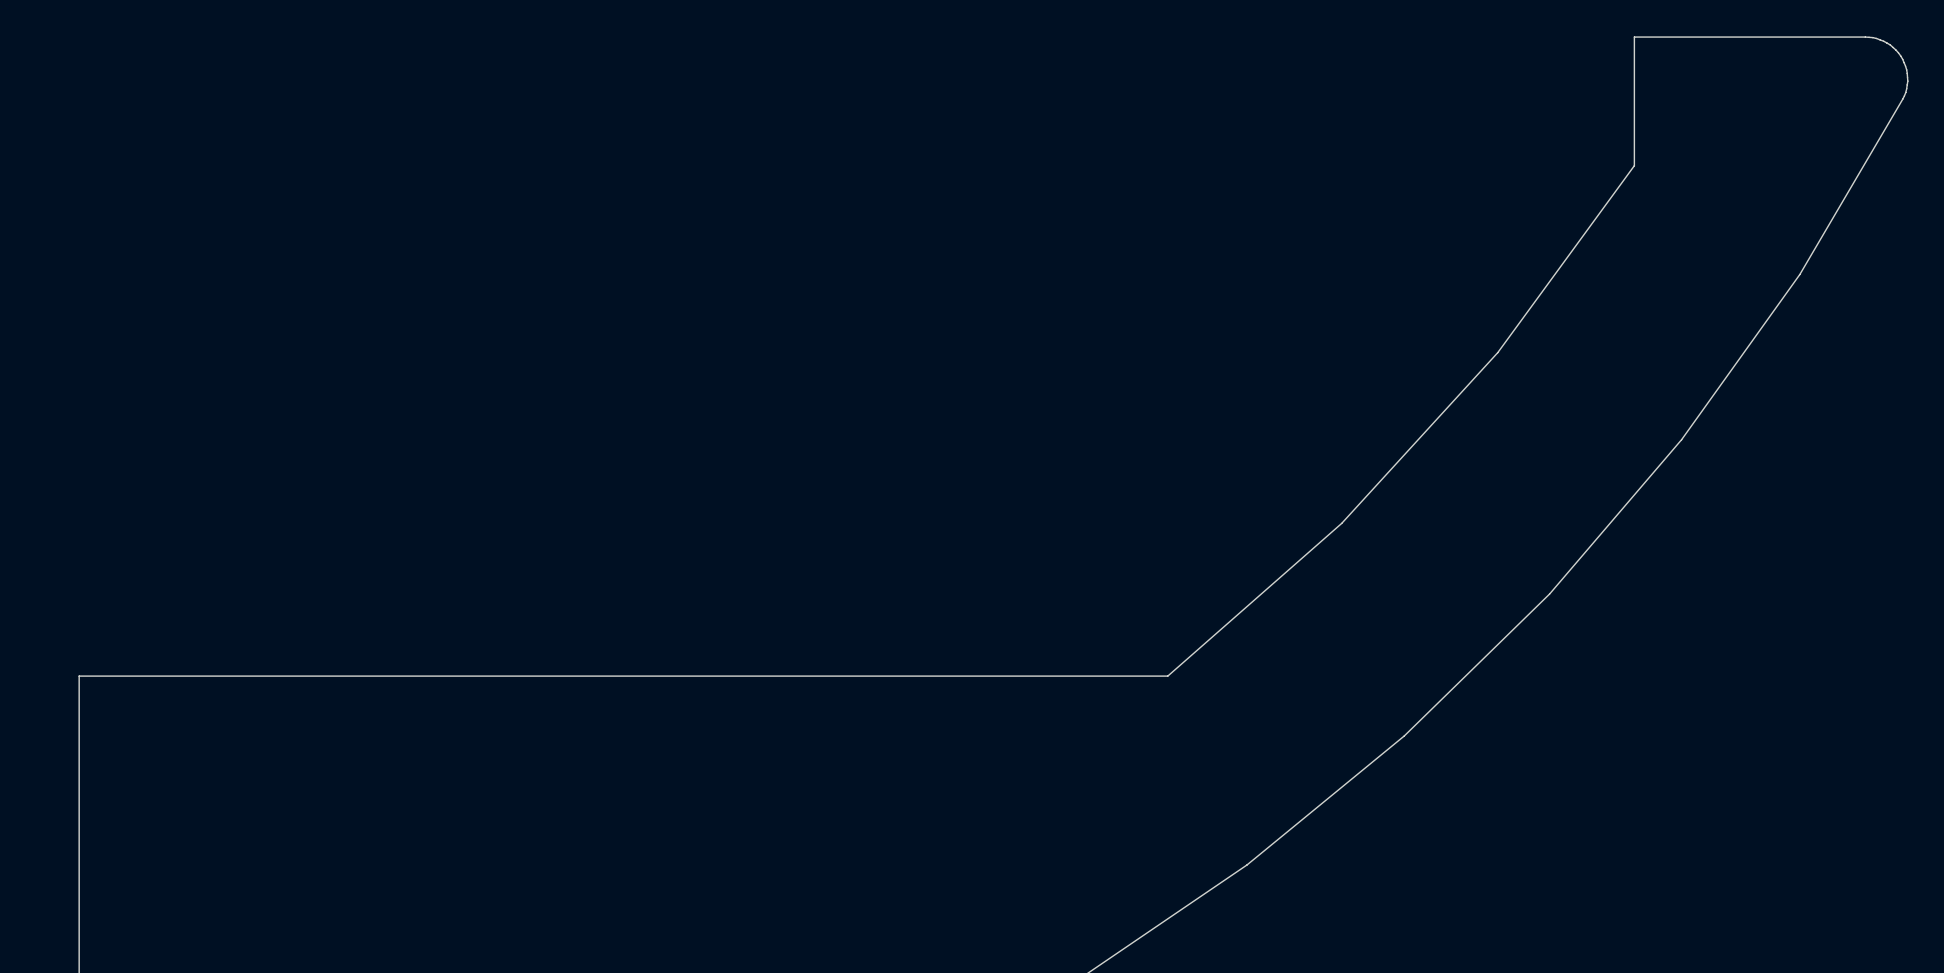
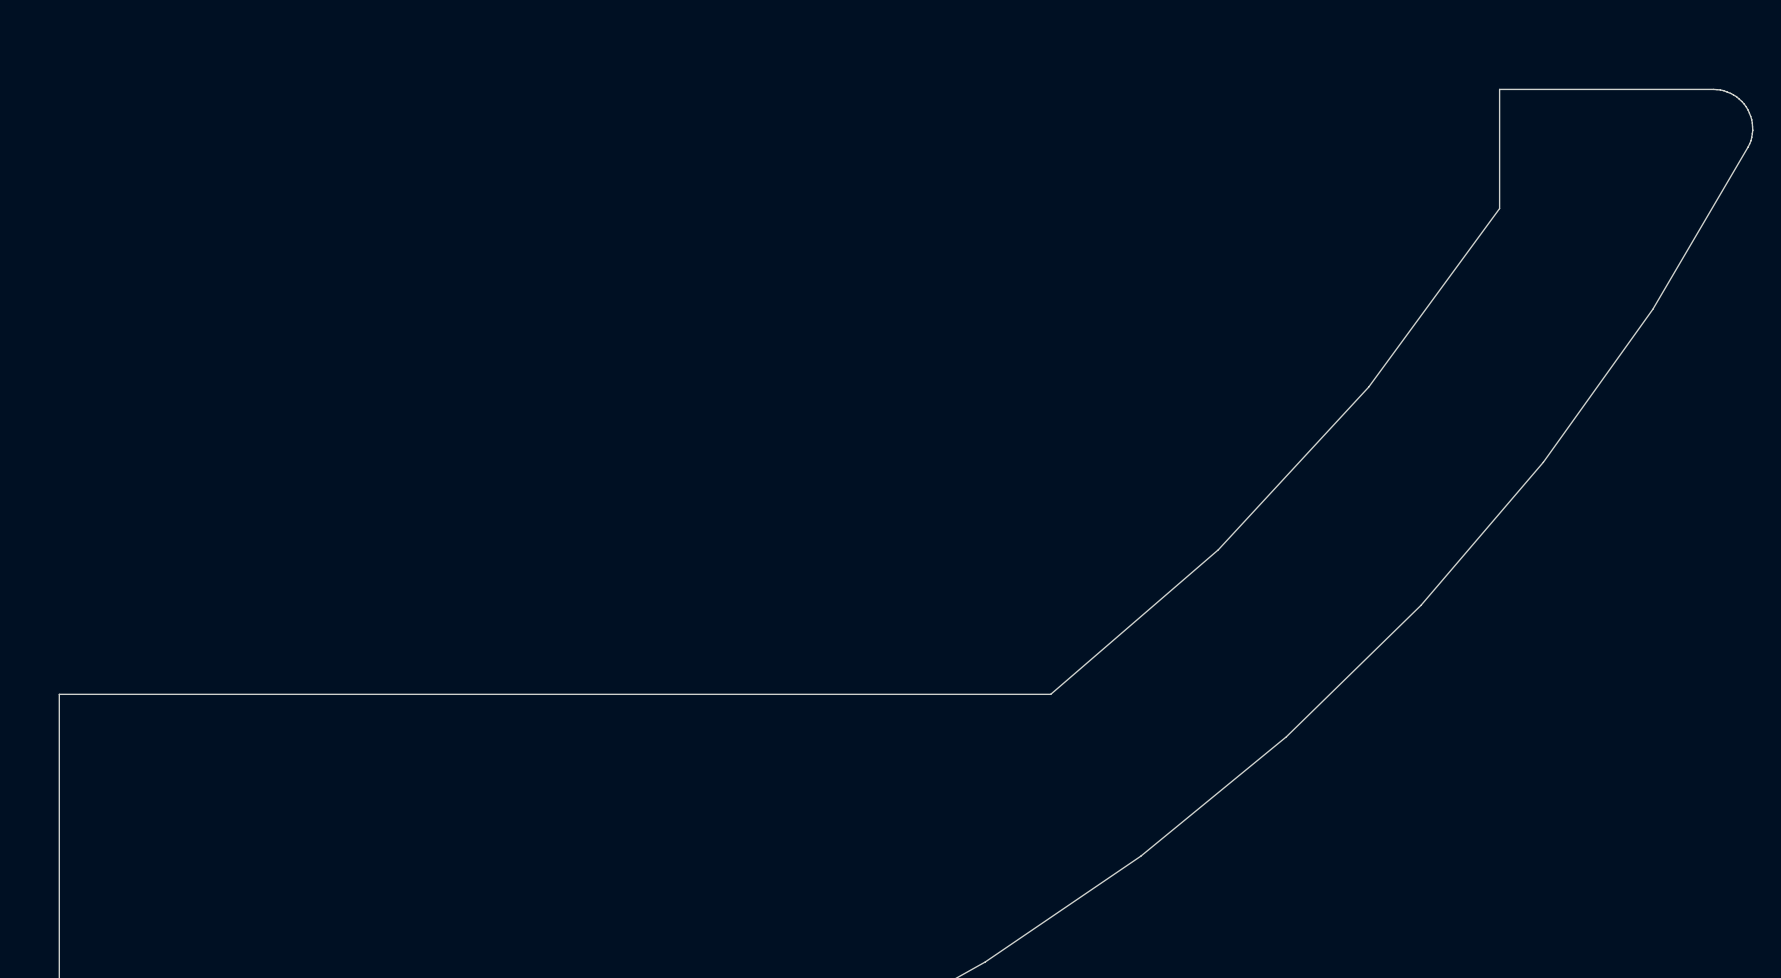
board edge: (1634, 165) (1497, 352) (1341, 523) (1167, 676) (79, 676) (79, 690) -> (1499, 208) (1368, 387) (1218, 549) (1050, 694) (59, 694)

